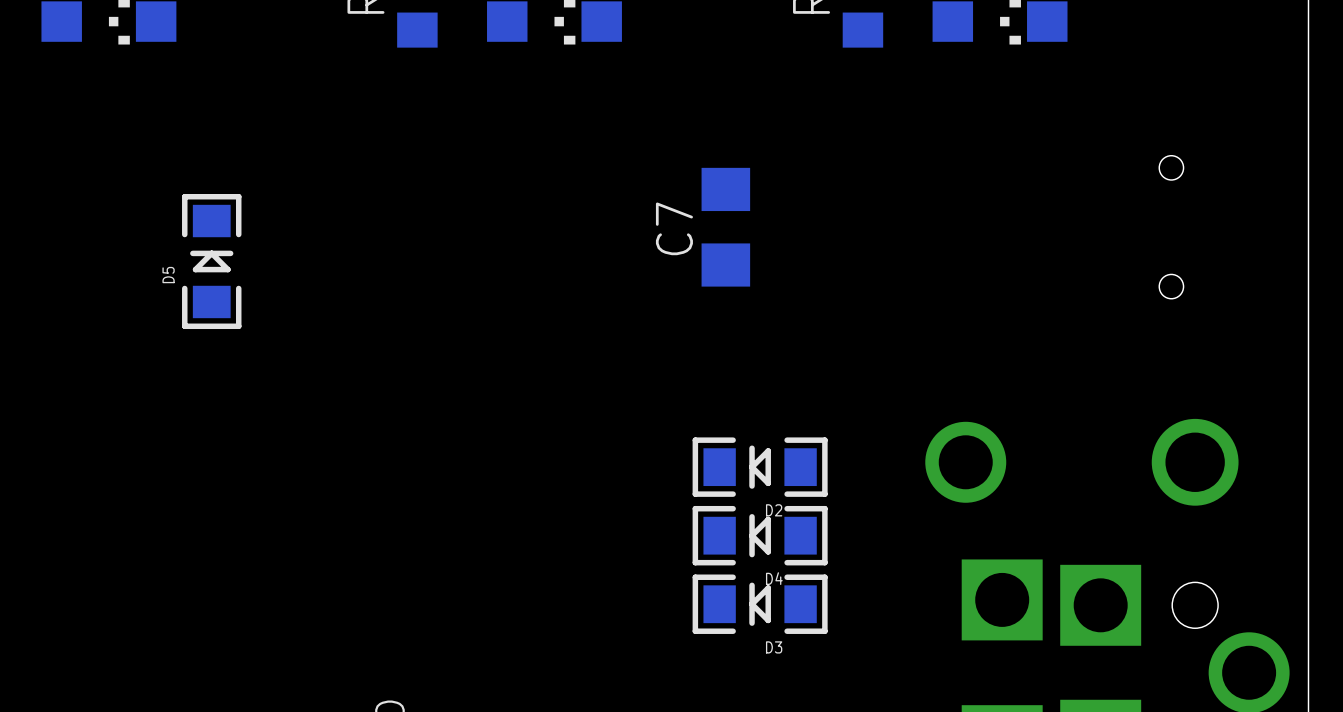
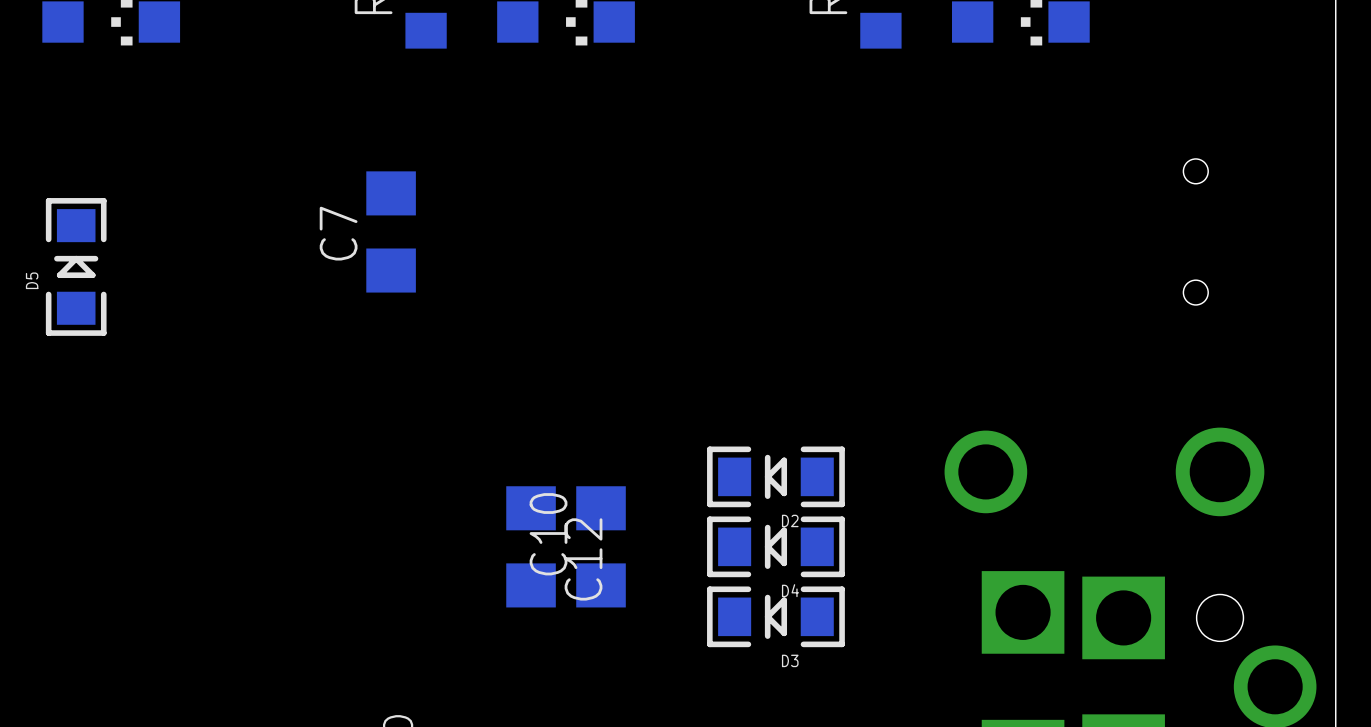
C7 position: (725, 227) -> (391, 231)
D5 position: (211, 261) -> (76, 266)
C12: none -> (531, 546)
C10: none -> (601, 546)

